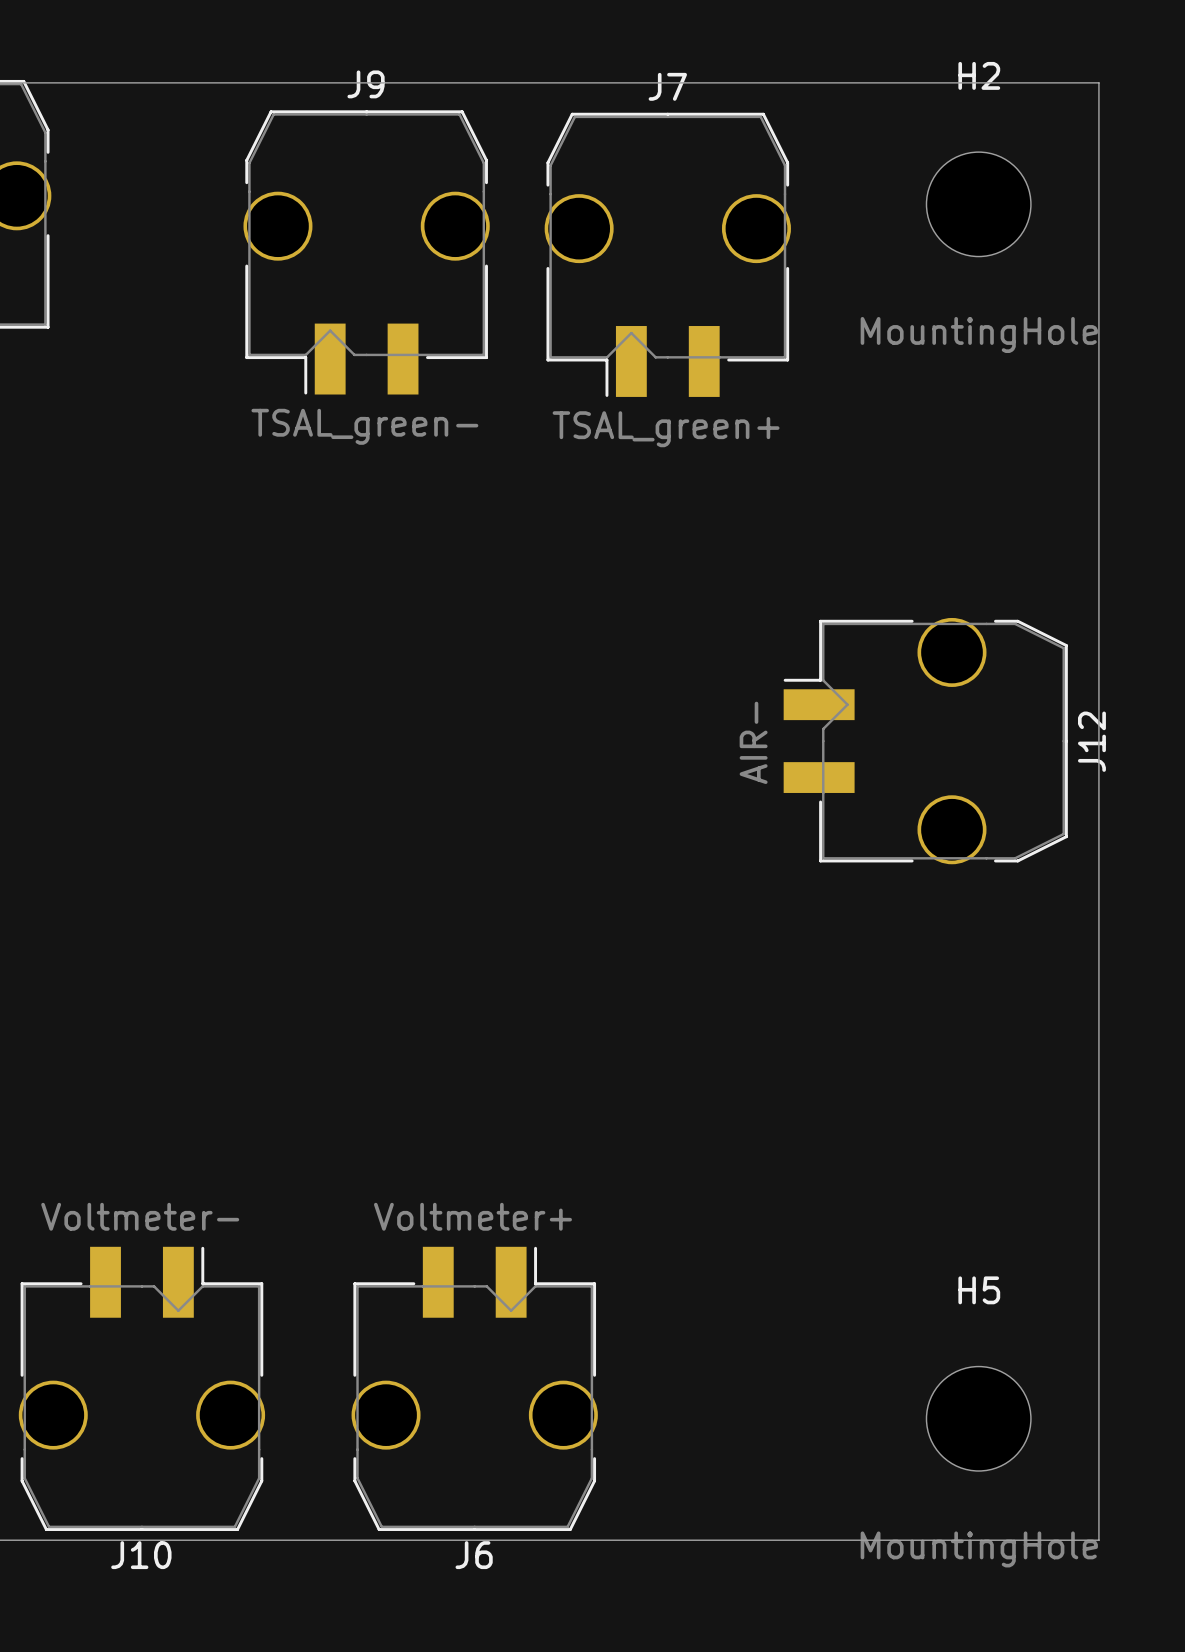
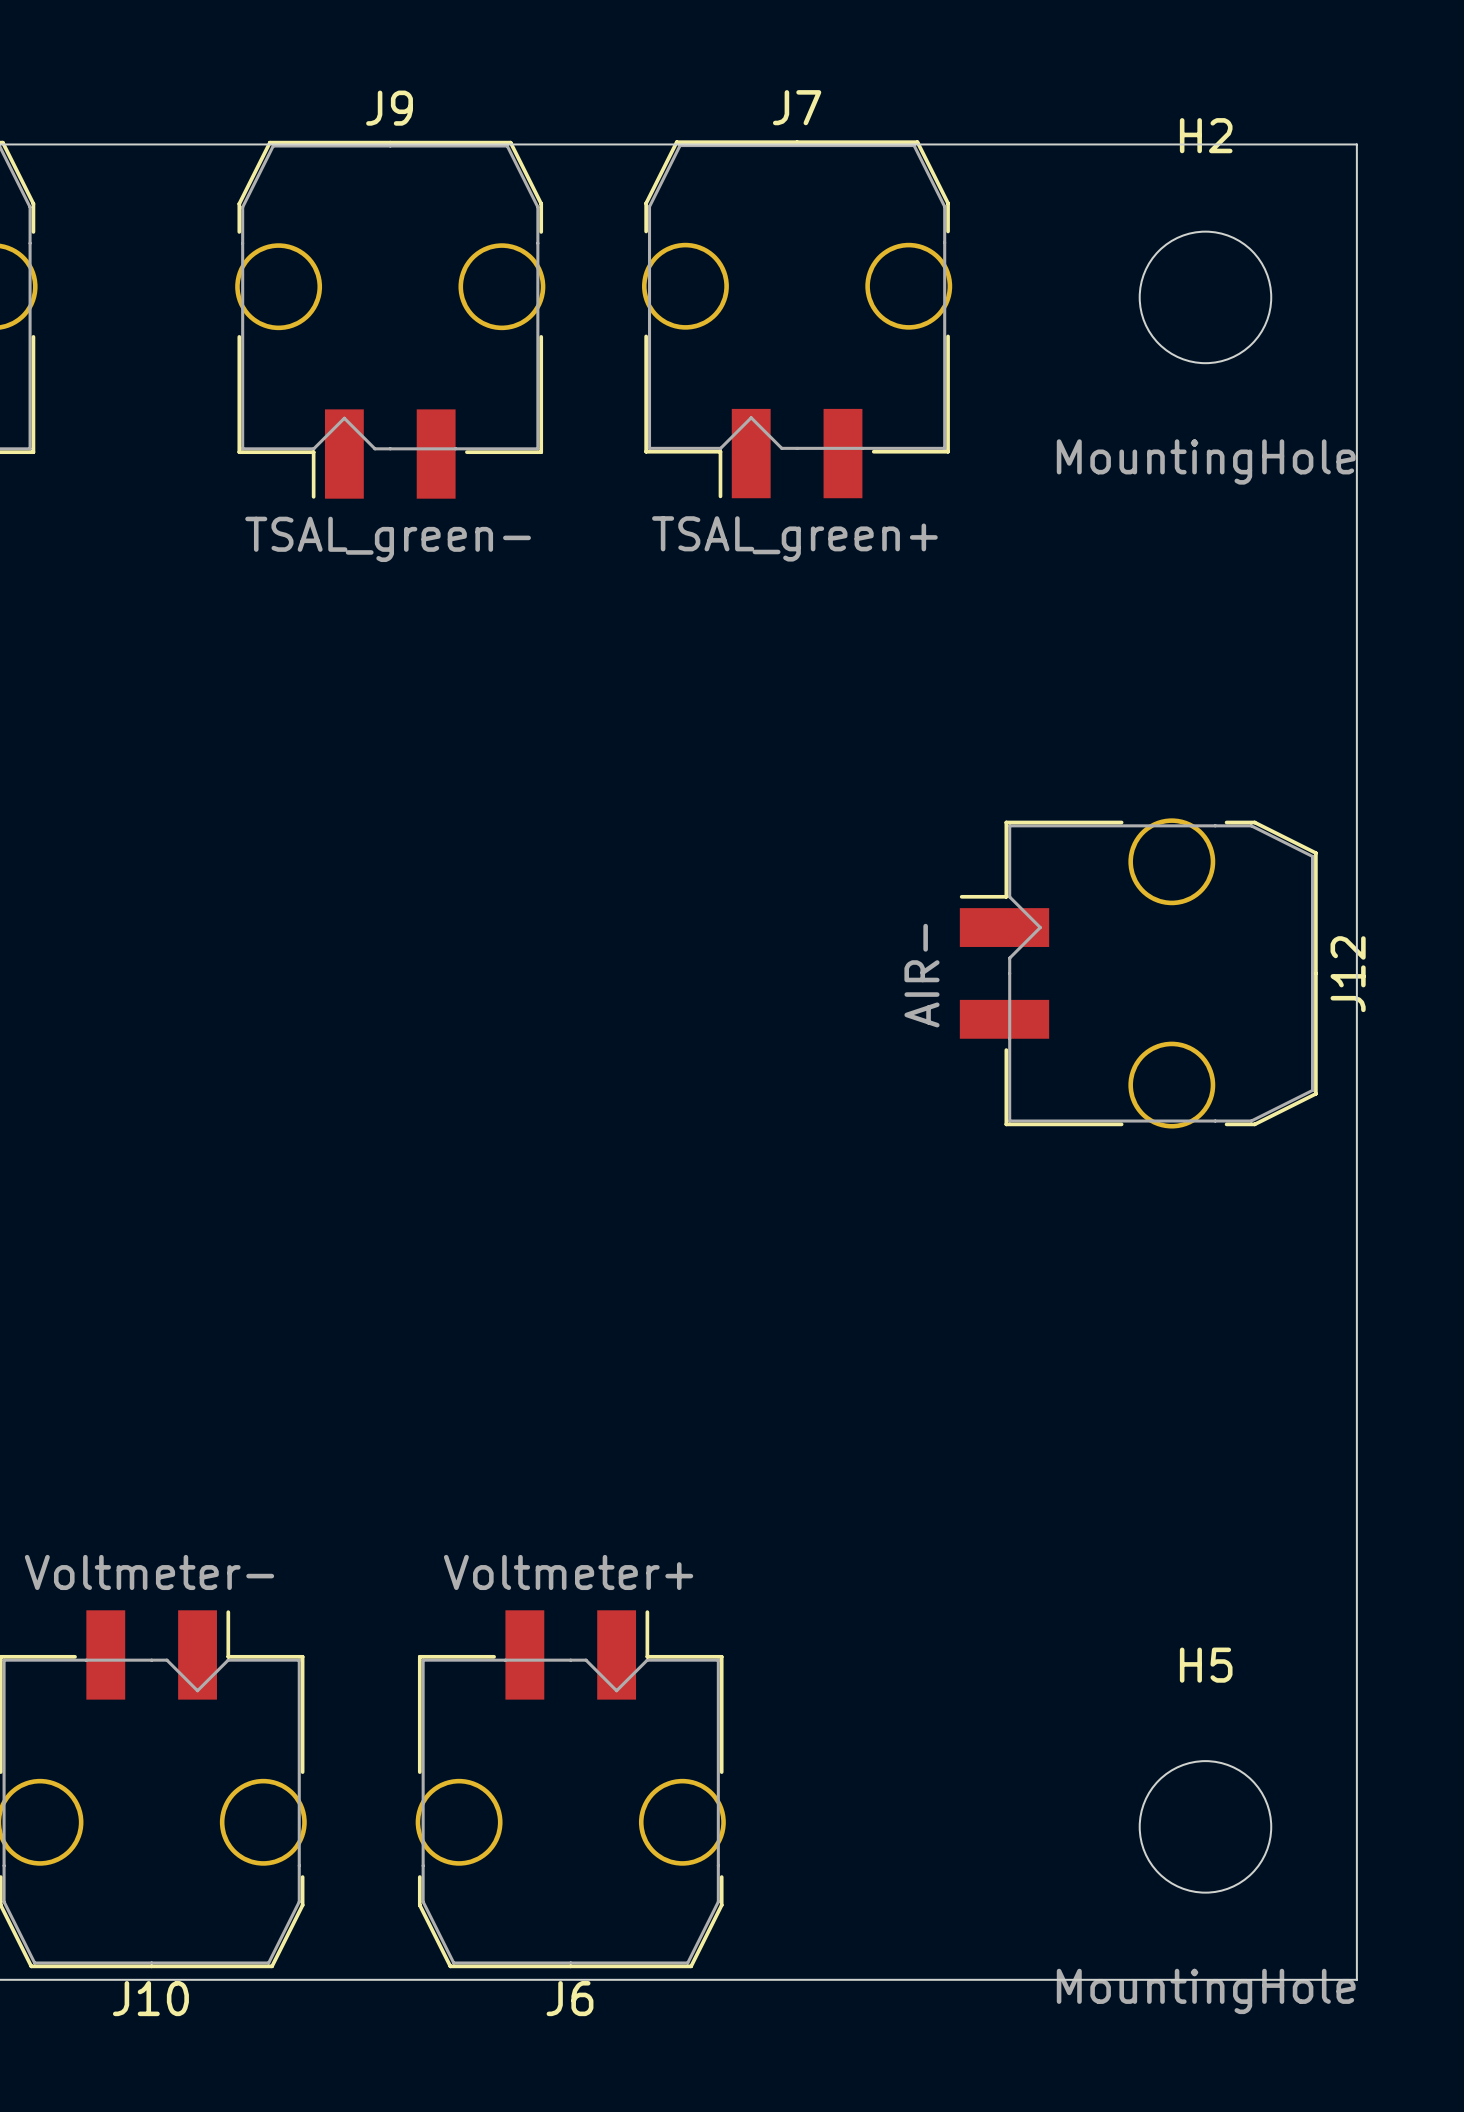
J9 position: (366, 252) -> (390, 319)
J7 position: (667, 254) -> (797, 319)

